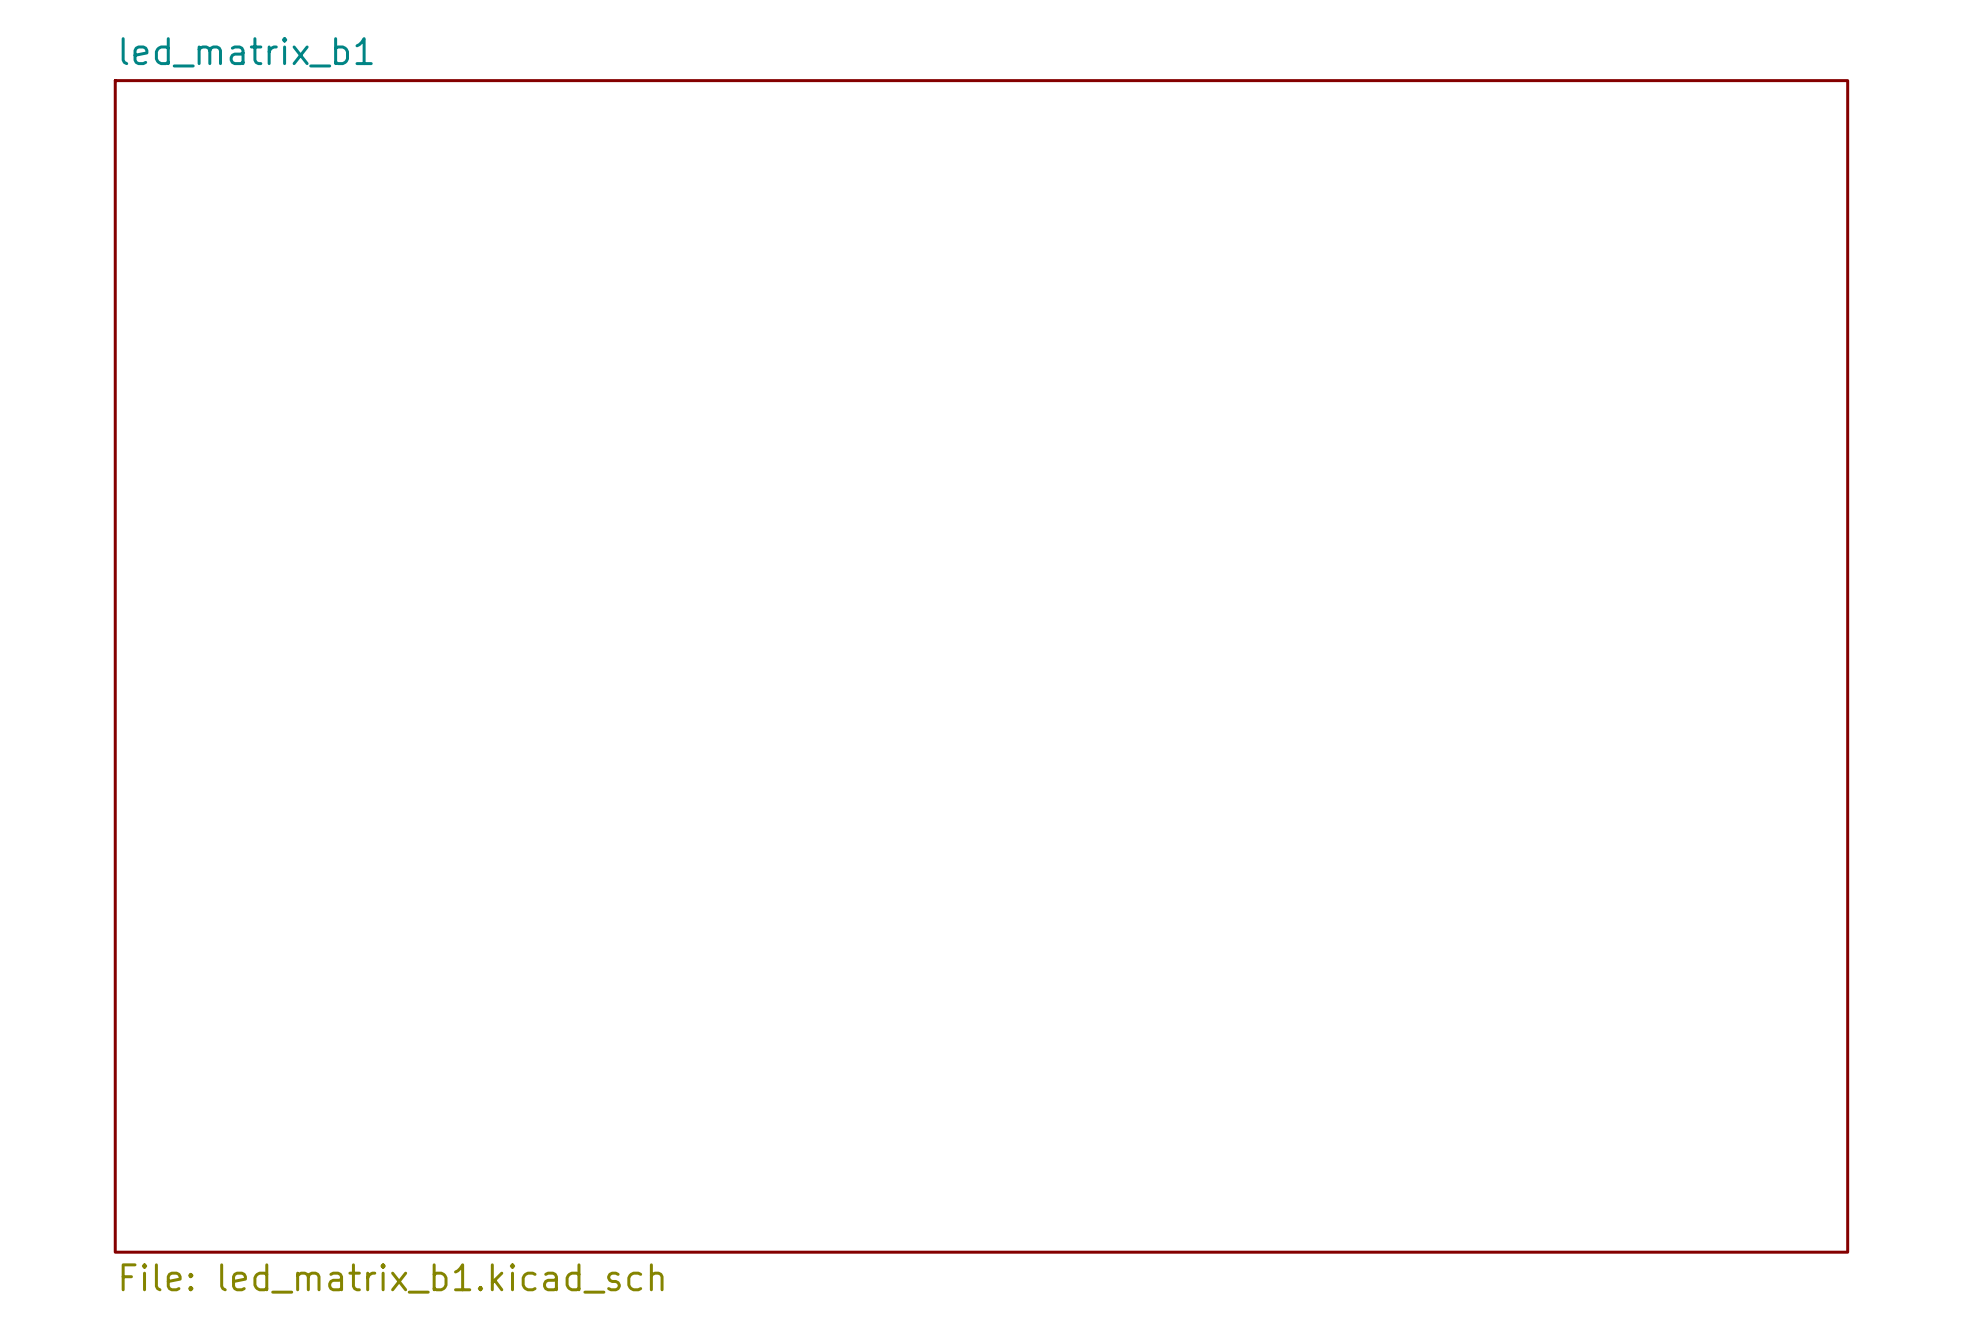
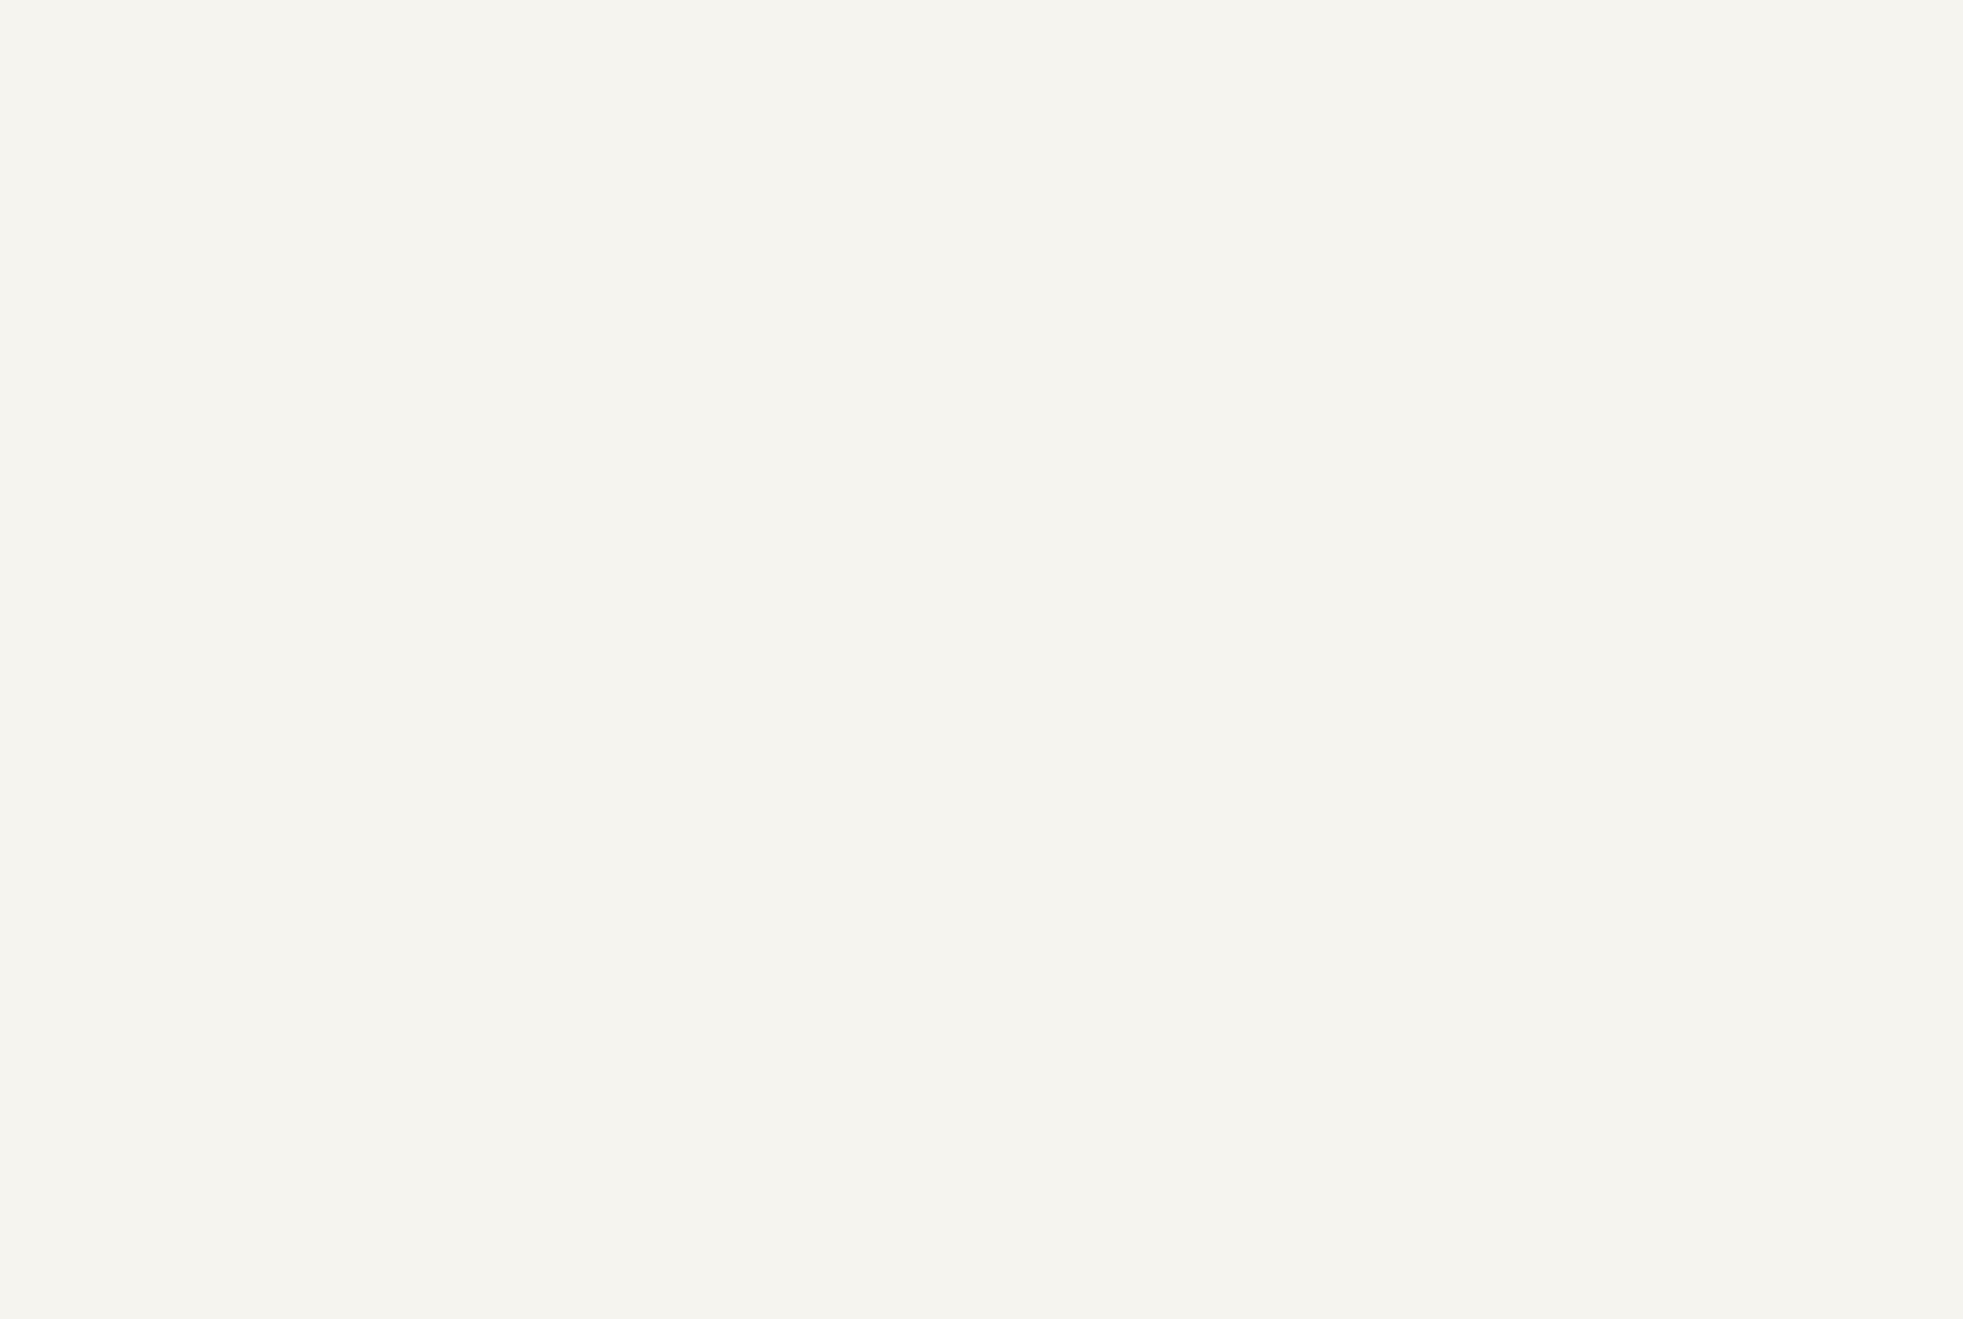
sheet led_matrix_b1: File: led_matrix_b1.kicad_sch (981, 666) -> none

